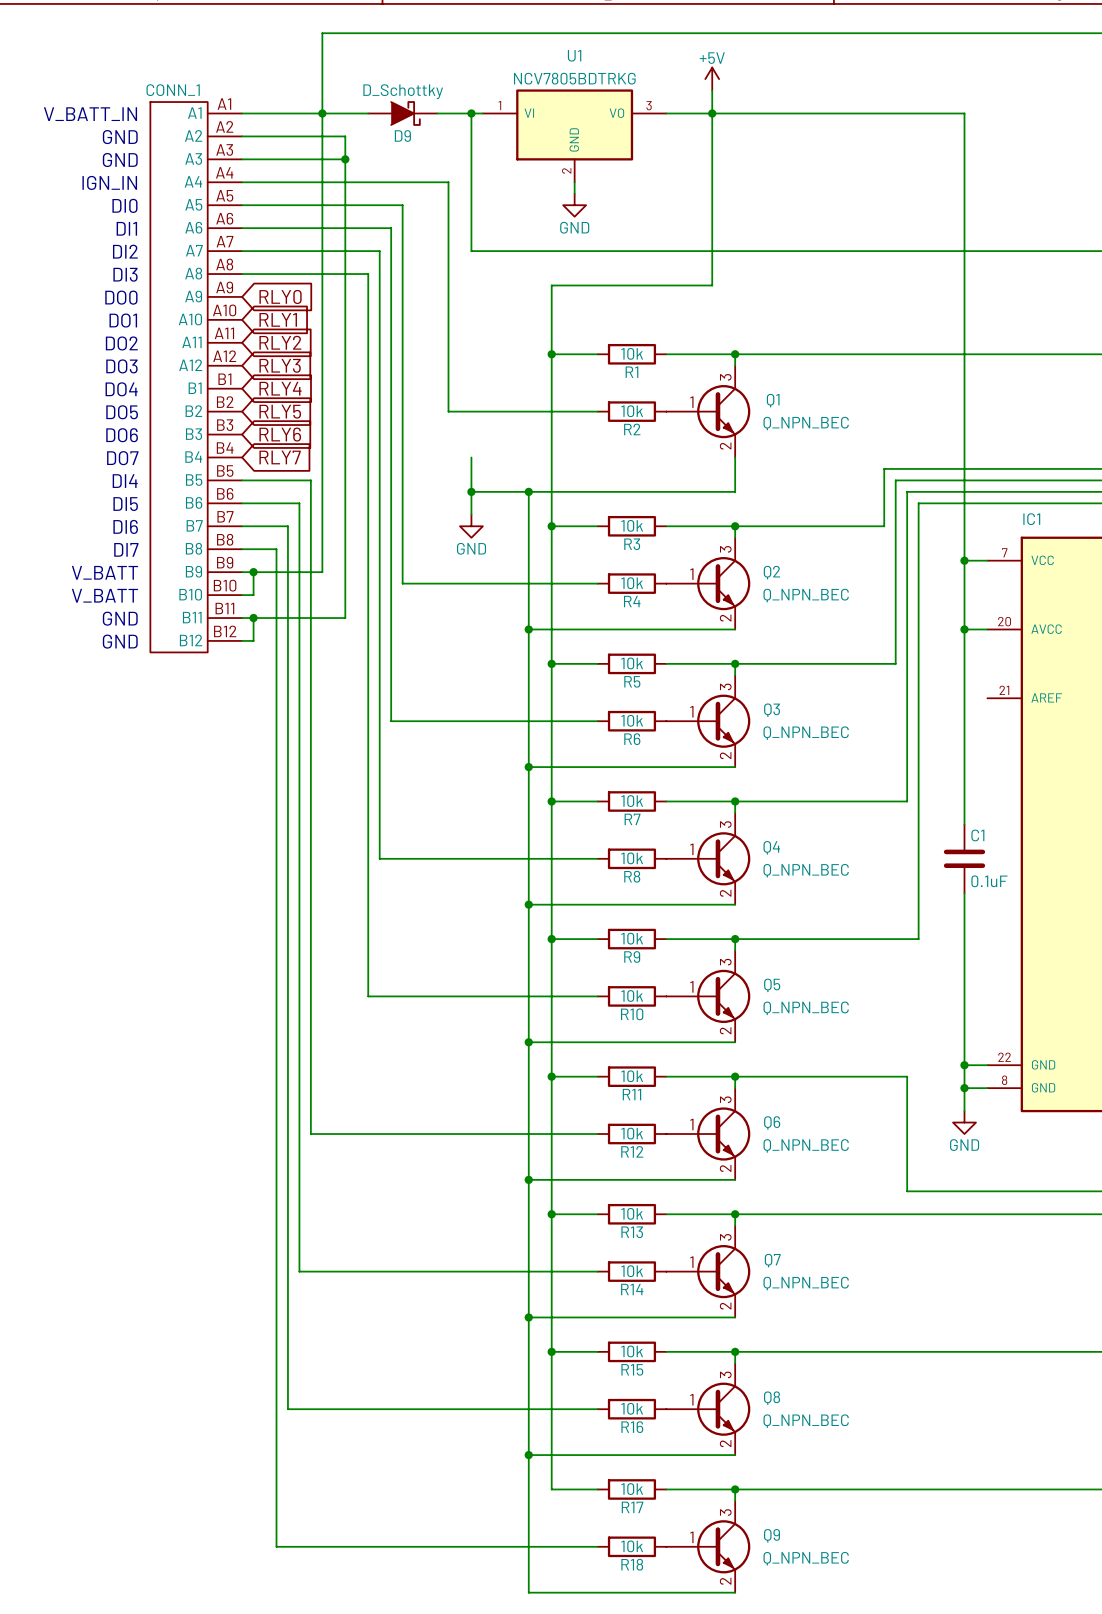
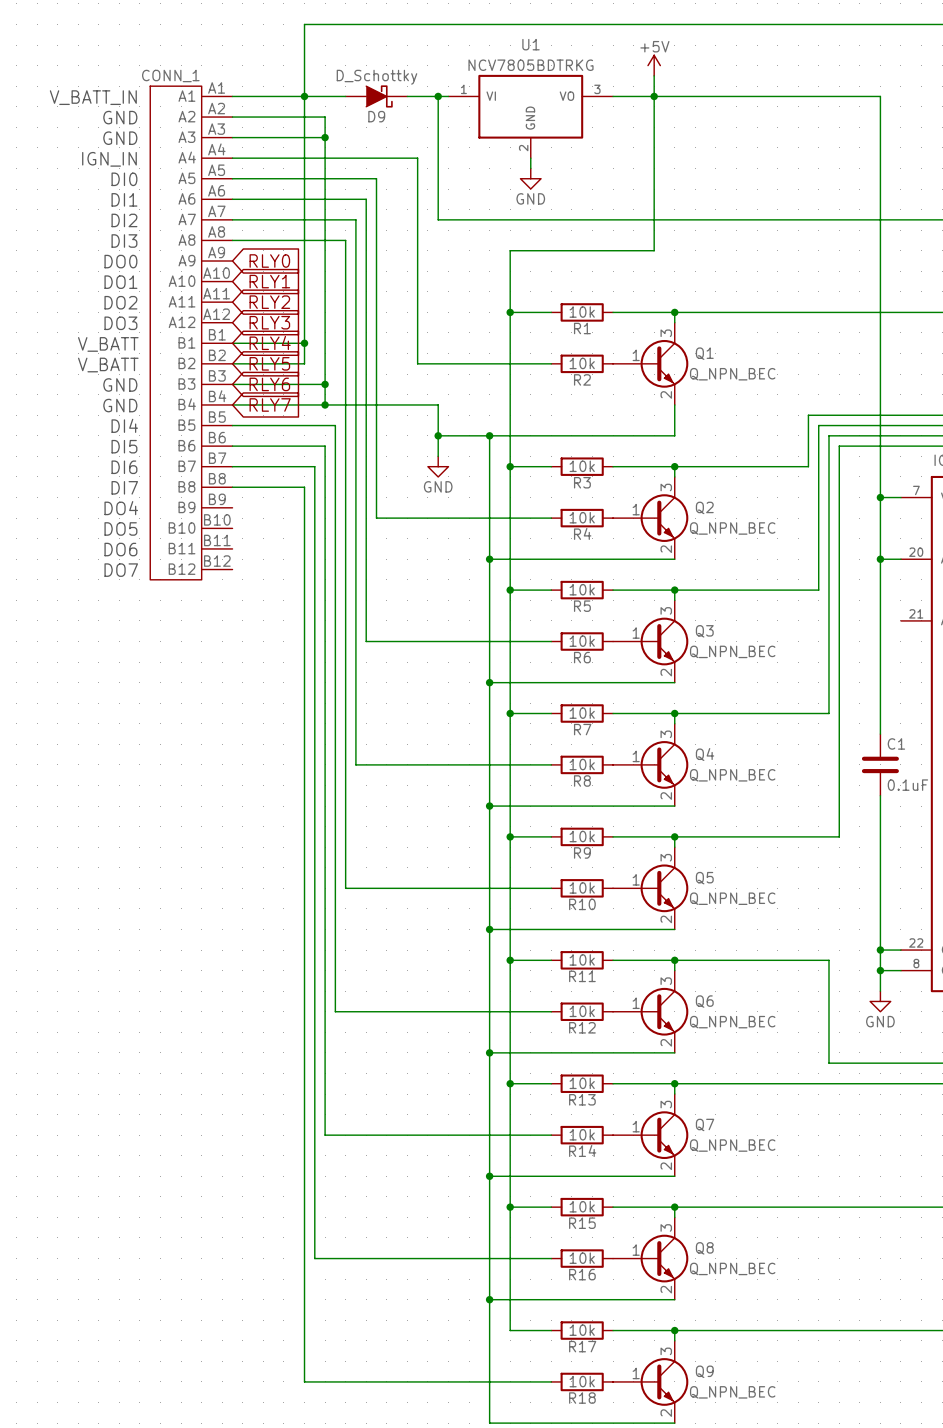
junction: none -> (304, 343)
text: DO4 (121, 389) -> V_BATT (108, 344)
wire: none -> (232, 363) (304, 363)
wire: (322, 411) (322, 549) -> (263, 487) (304, 487)
text: DO5 (122, 412) -> V_BATT (108, 365)
junction: none -> (325, 384)
text: DO6 (122, 435) -> GND (120, 384)
wire: none -> (232, 404) (438, 404)
wire: (345, 457) (345, 503) -> (283, 446) (325, 446)
junction: none -> (325, 404)
text: DO7 (122, 458) -> GND (120, 405)
wire: (310, 480) (310, 1134) (356, 1134) -> (294, 425) (335, 425) (335, 1011)
wire: (299, 503) (299, 1271) (345, 1271) -> (325, 548) (325, 1135)
wire: (287, 526) (287, 1409) (333, 1409) -> (273, 466) (314, 466) (314, 1258)
wire: (276, 549) (276, 1546) (322, 1546) -> (304, 507) (304, 1381)
text: V_BATT (104, 572) -> DO4 (121, 508)
wire: (242, 572) (322, 572) -> (232, 343) (304, 343)
wire: (253, 572) (253, 595) (242, 595) -> none
junction: (253, 572) -> none
text: V_BATT (104, 595) -> DO5 (120, 528)
text: GND (120, 618) -> DO6 (120, 549)
wire: (242, 618) (345, 618) -> (232, 384) (325, 384)
wire: (253, 618) (253, 640) (242, 640) -> none
junction: (253, 618) -> none
text: GND (120, 641) -> DO7 (121, 570)

